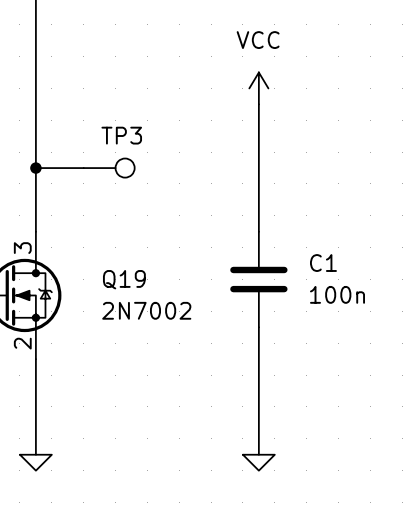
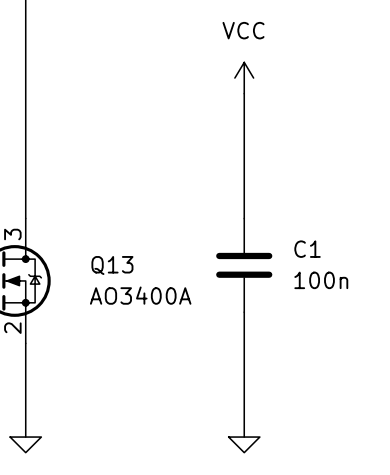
wire: (35, 168) (83, 168) -> none
junction: (35, 168) -> none
TP3: (109, 168) -> none
Q19 name: Q19 (124, 279) -> Q13 (112, 265)
Q19 value: 2N7002 (146, 310) -> AO3400A (140, 295)

